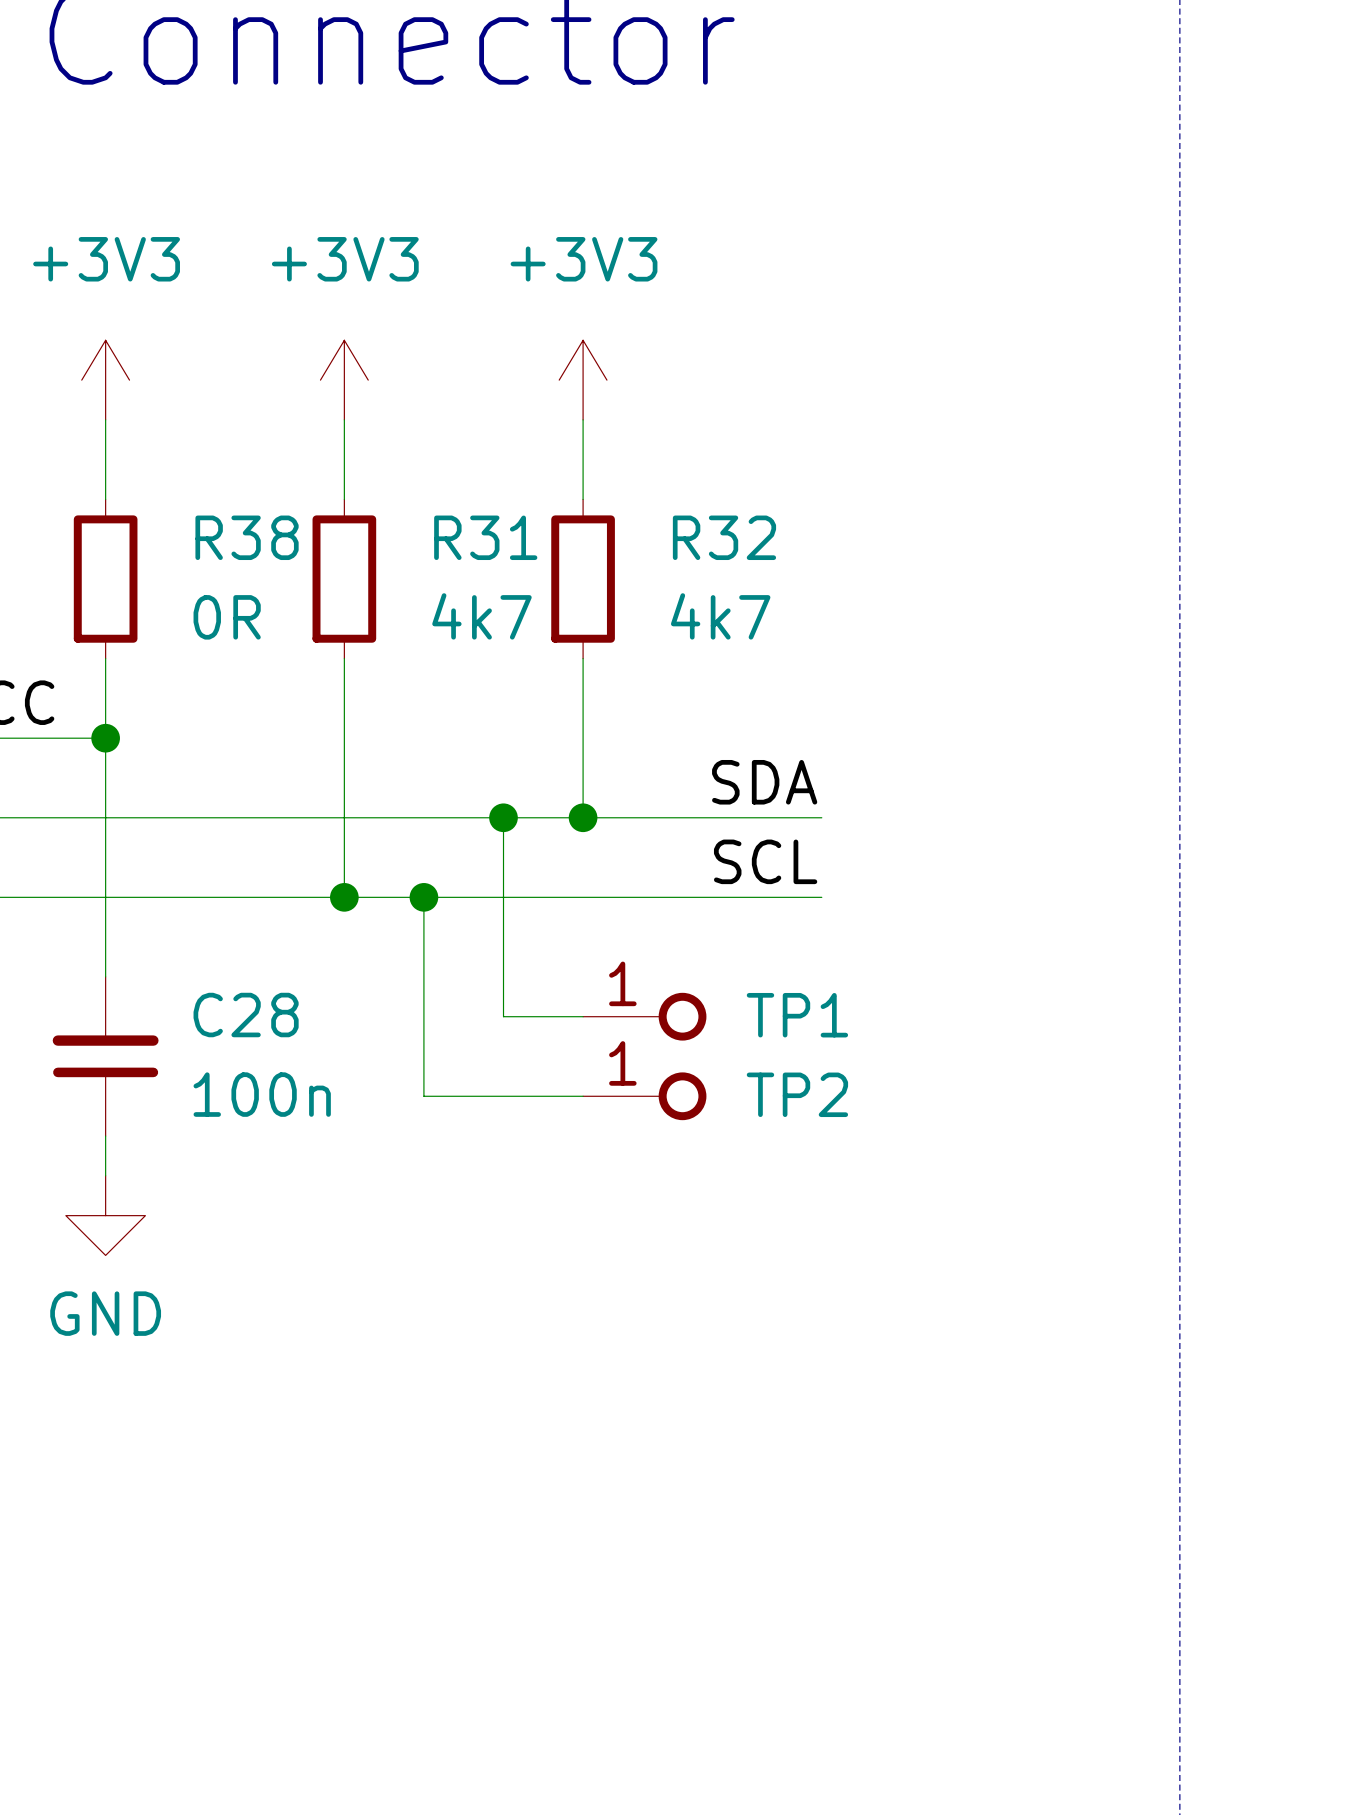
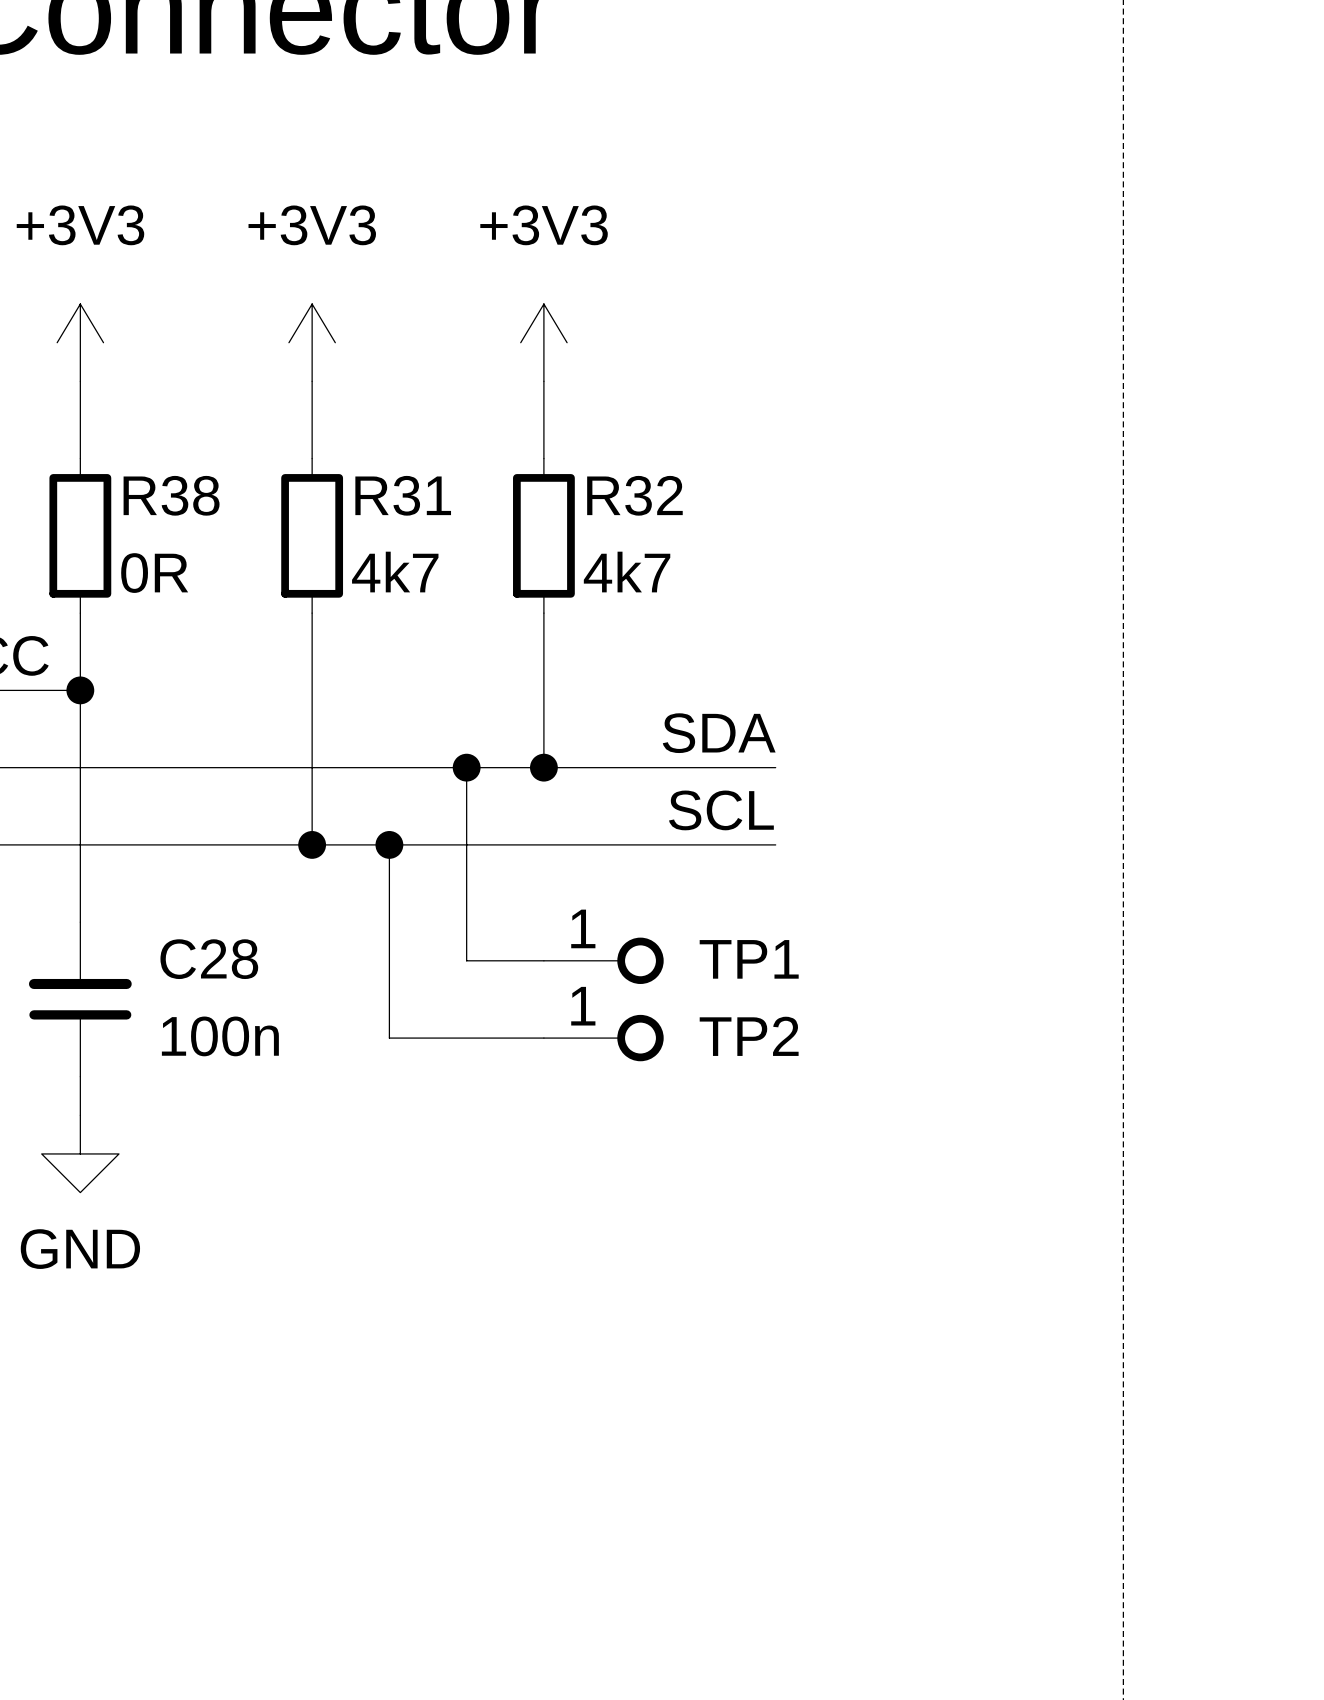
R38 name position: R38 (247, 537) -> R38 (171, 495)
R31 name position: R31 (485, 537) -> R31 (403, 495)
R32 name position: R32 (724, 537) -> R32 (634, 495)
R31 text position: 4k7 (481, 616) -> 4k7 (395, 572)
R32 text position: 4k7 (720, 616) -> 4k7 (627, 572)
R38 text position: 0R (227, 617) -> 0R (154, 573)

